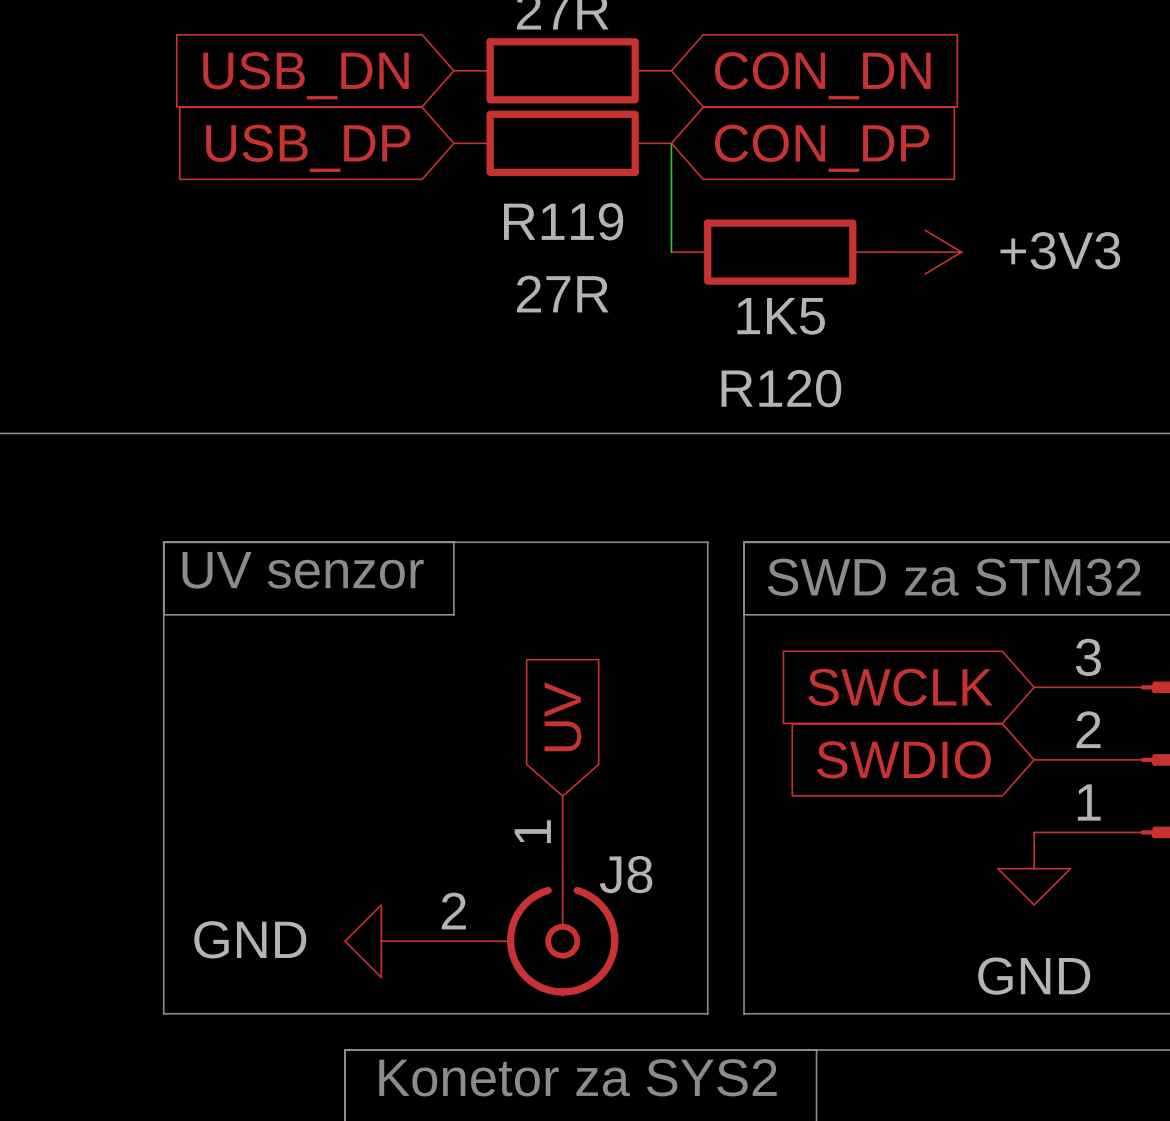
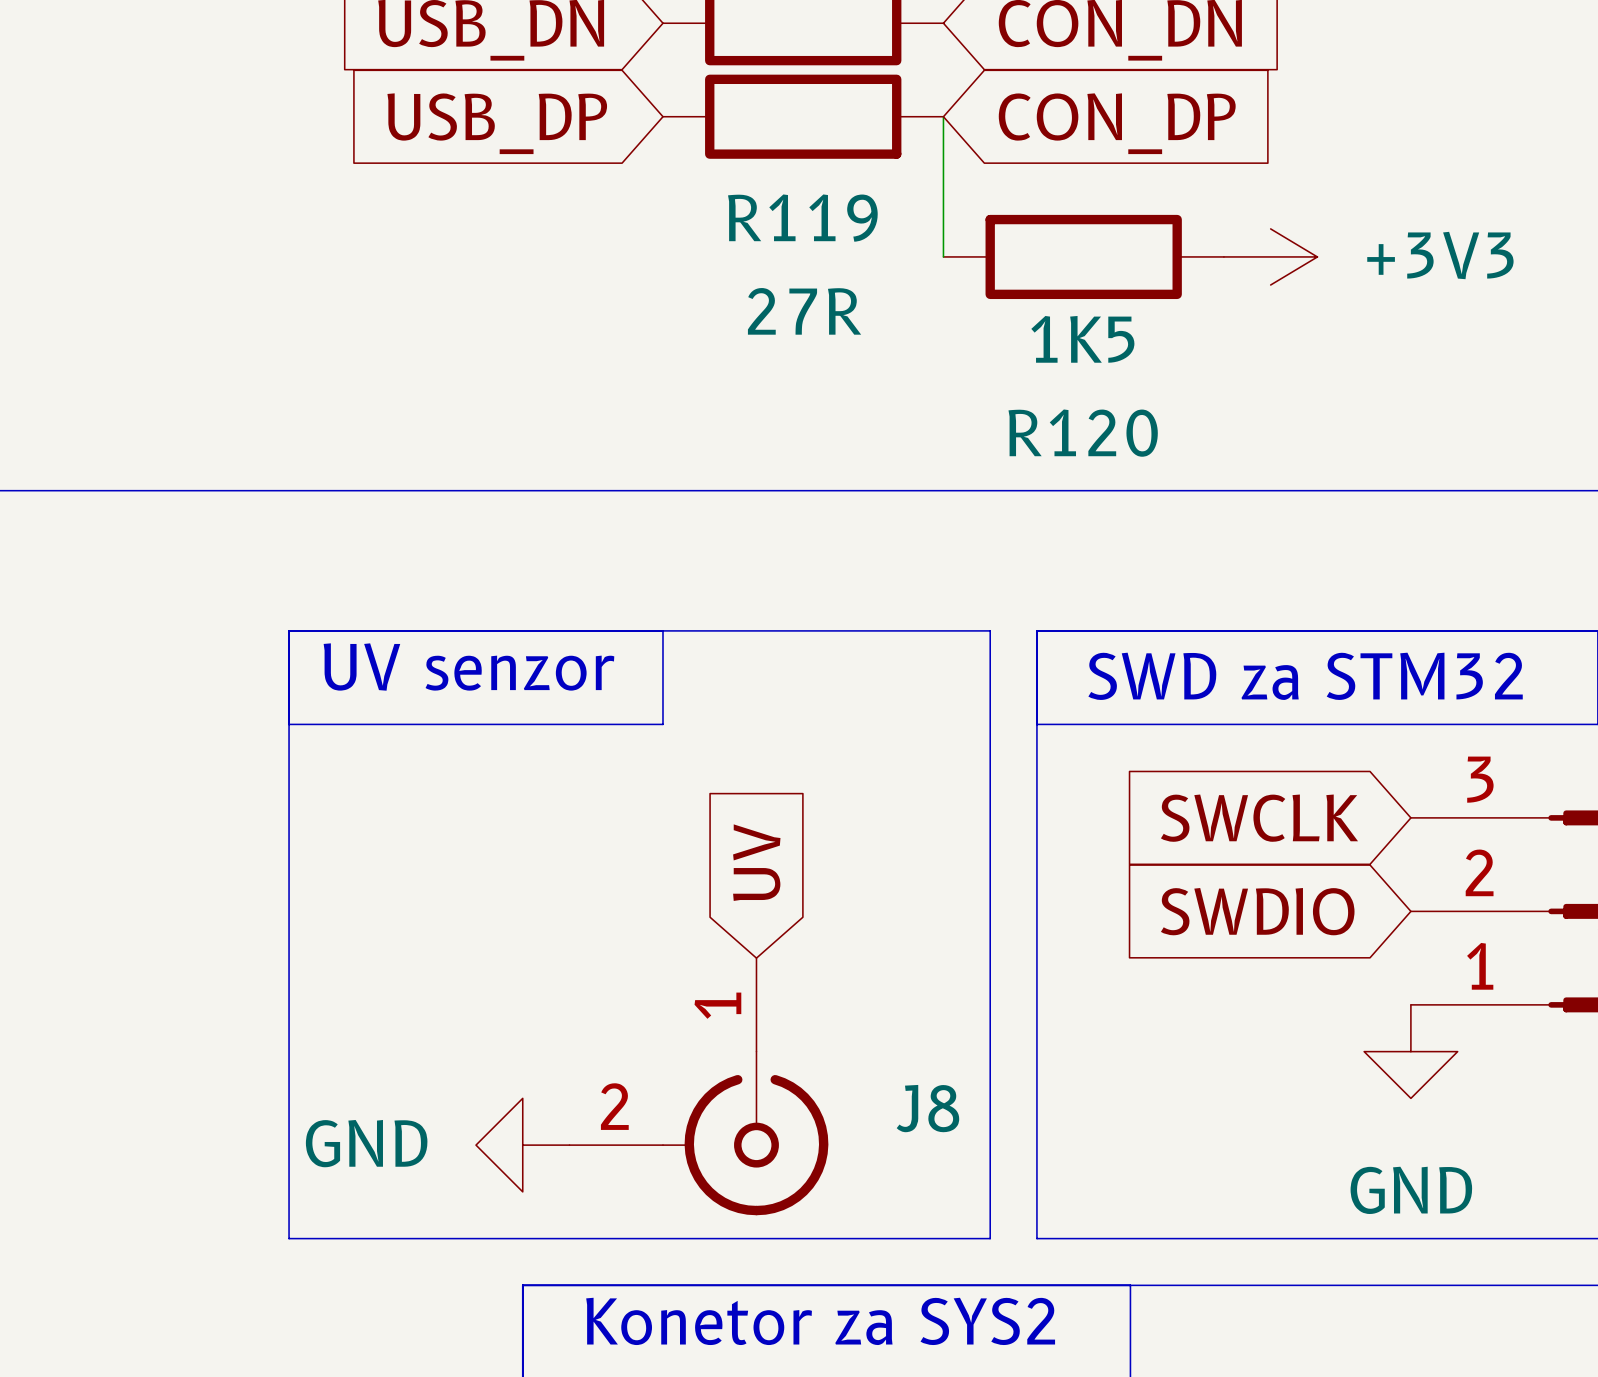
global label position: UV (562, 716) -> UV (756, 862)
J8 name position: J8 (626, 874) -> J8 (927, 1108)
J8 position: (518, 895) -> (698, 1086)
power symbol position: GND (381, 941) -> GND (522, 1145)

